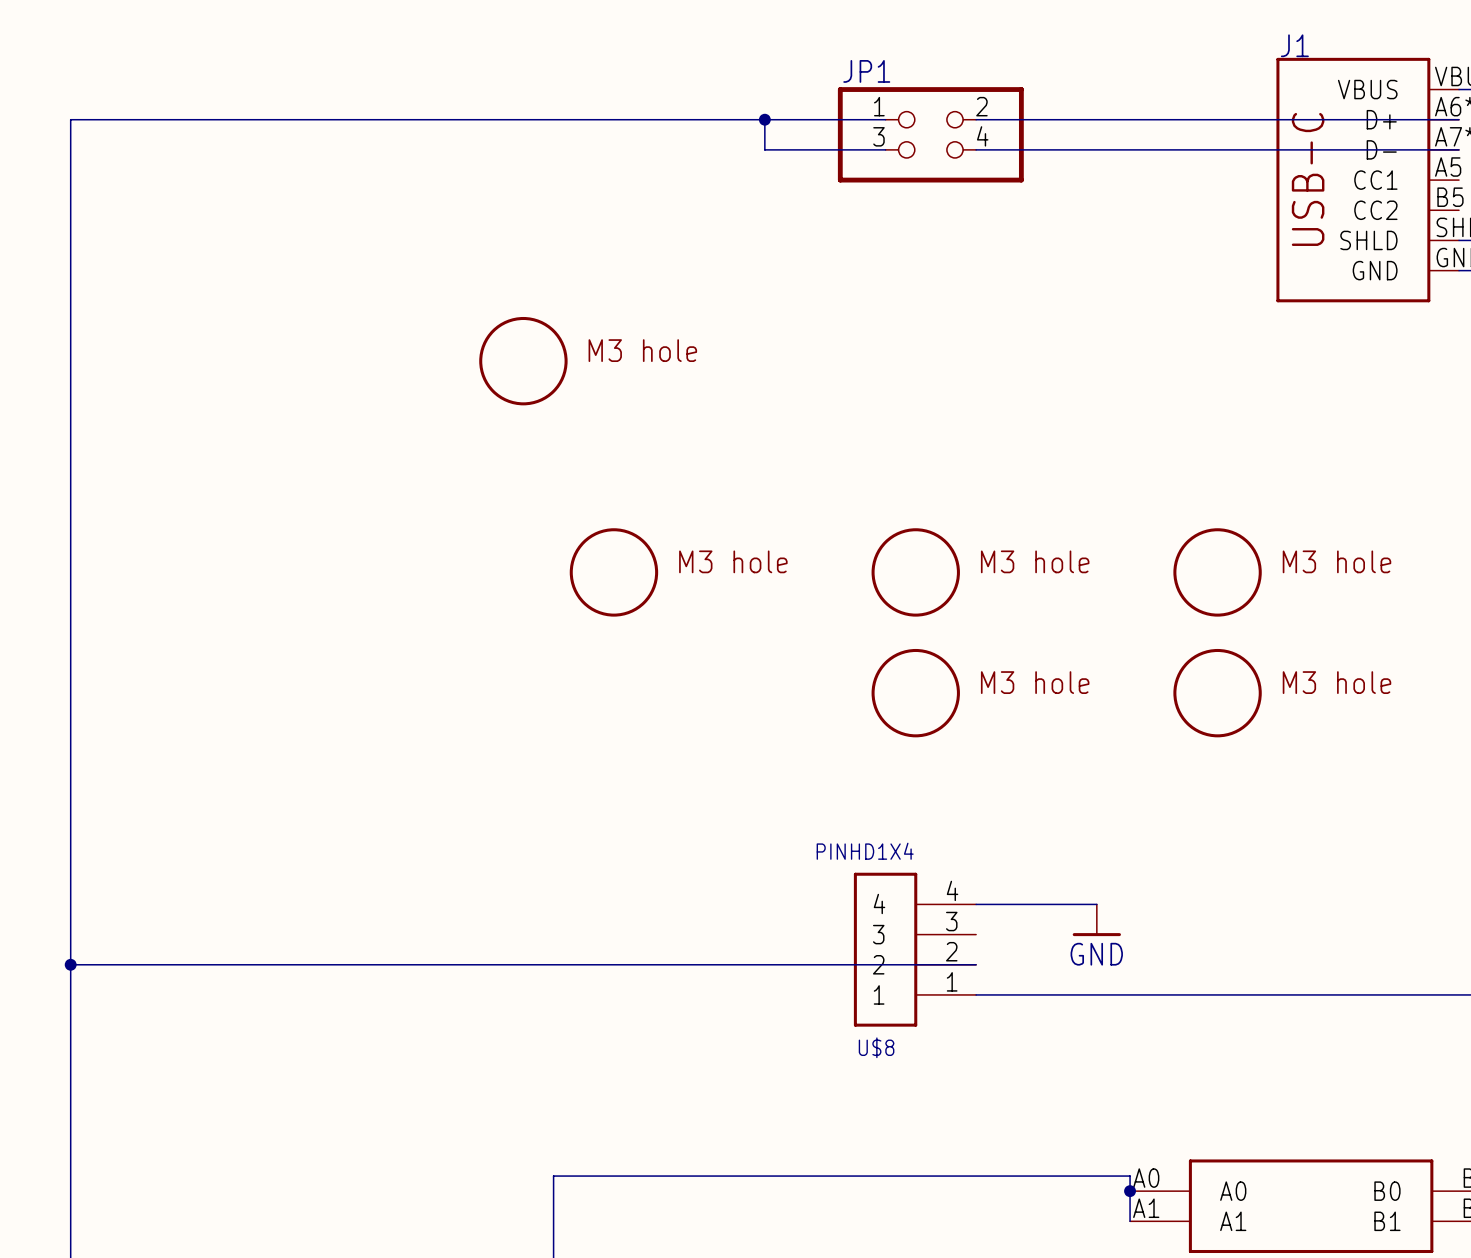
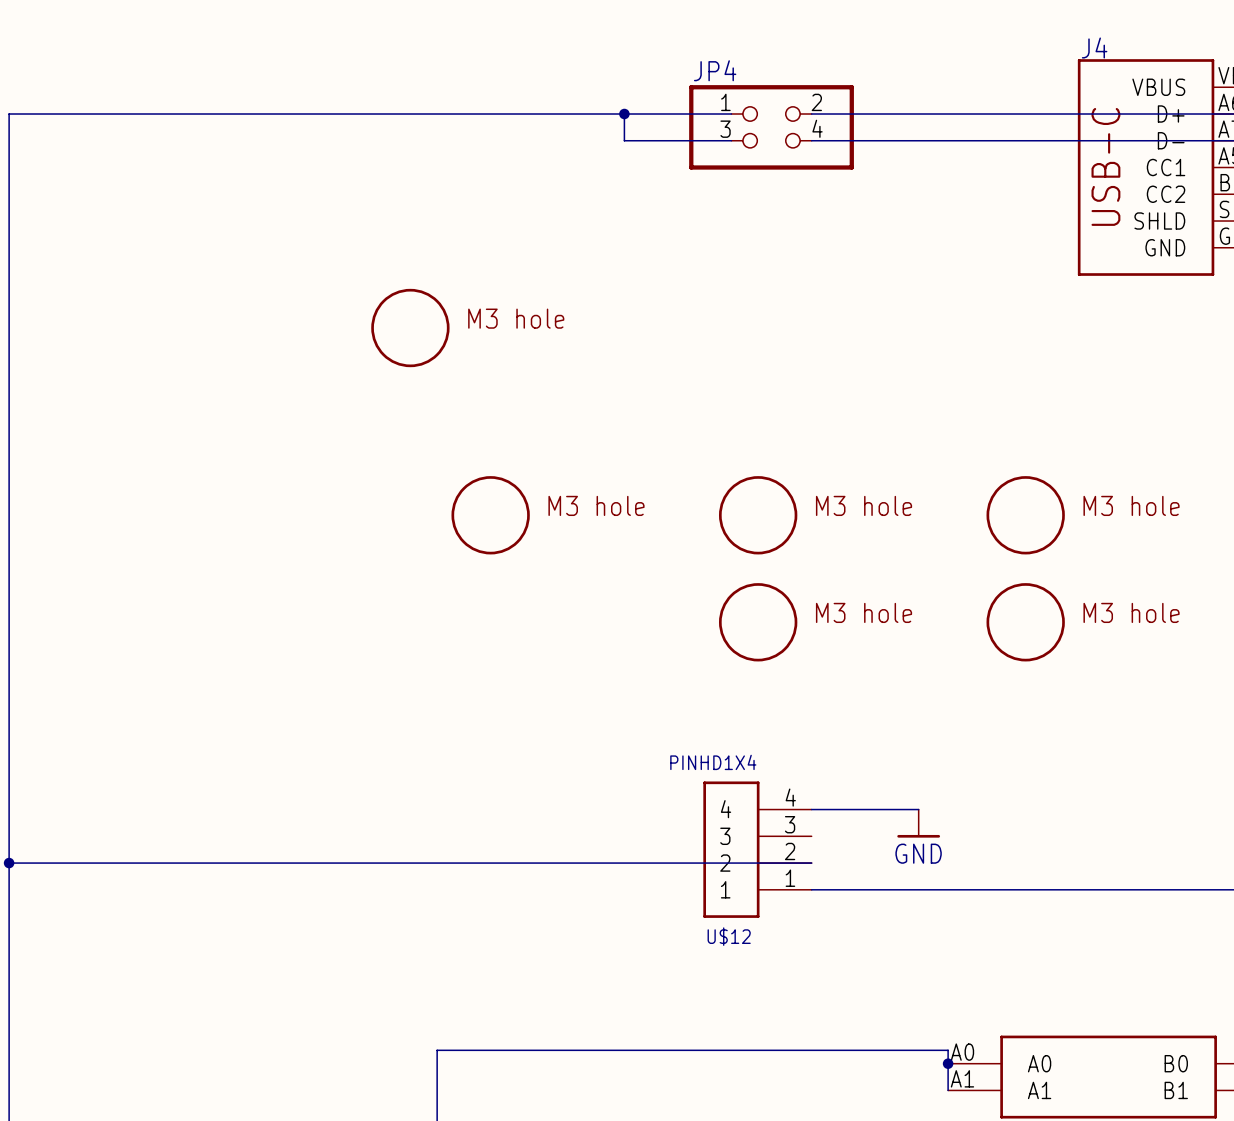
J1 name: J1 (1294, 45) -> J4 (1094, 48)
JP1 name: JP1 (866, 71) -> JP4 (715, 70)
U$8 name: U$8 (876, 1047) -> U$12 (729, 936)

